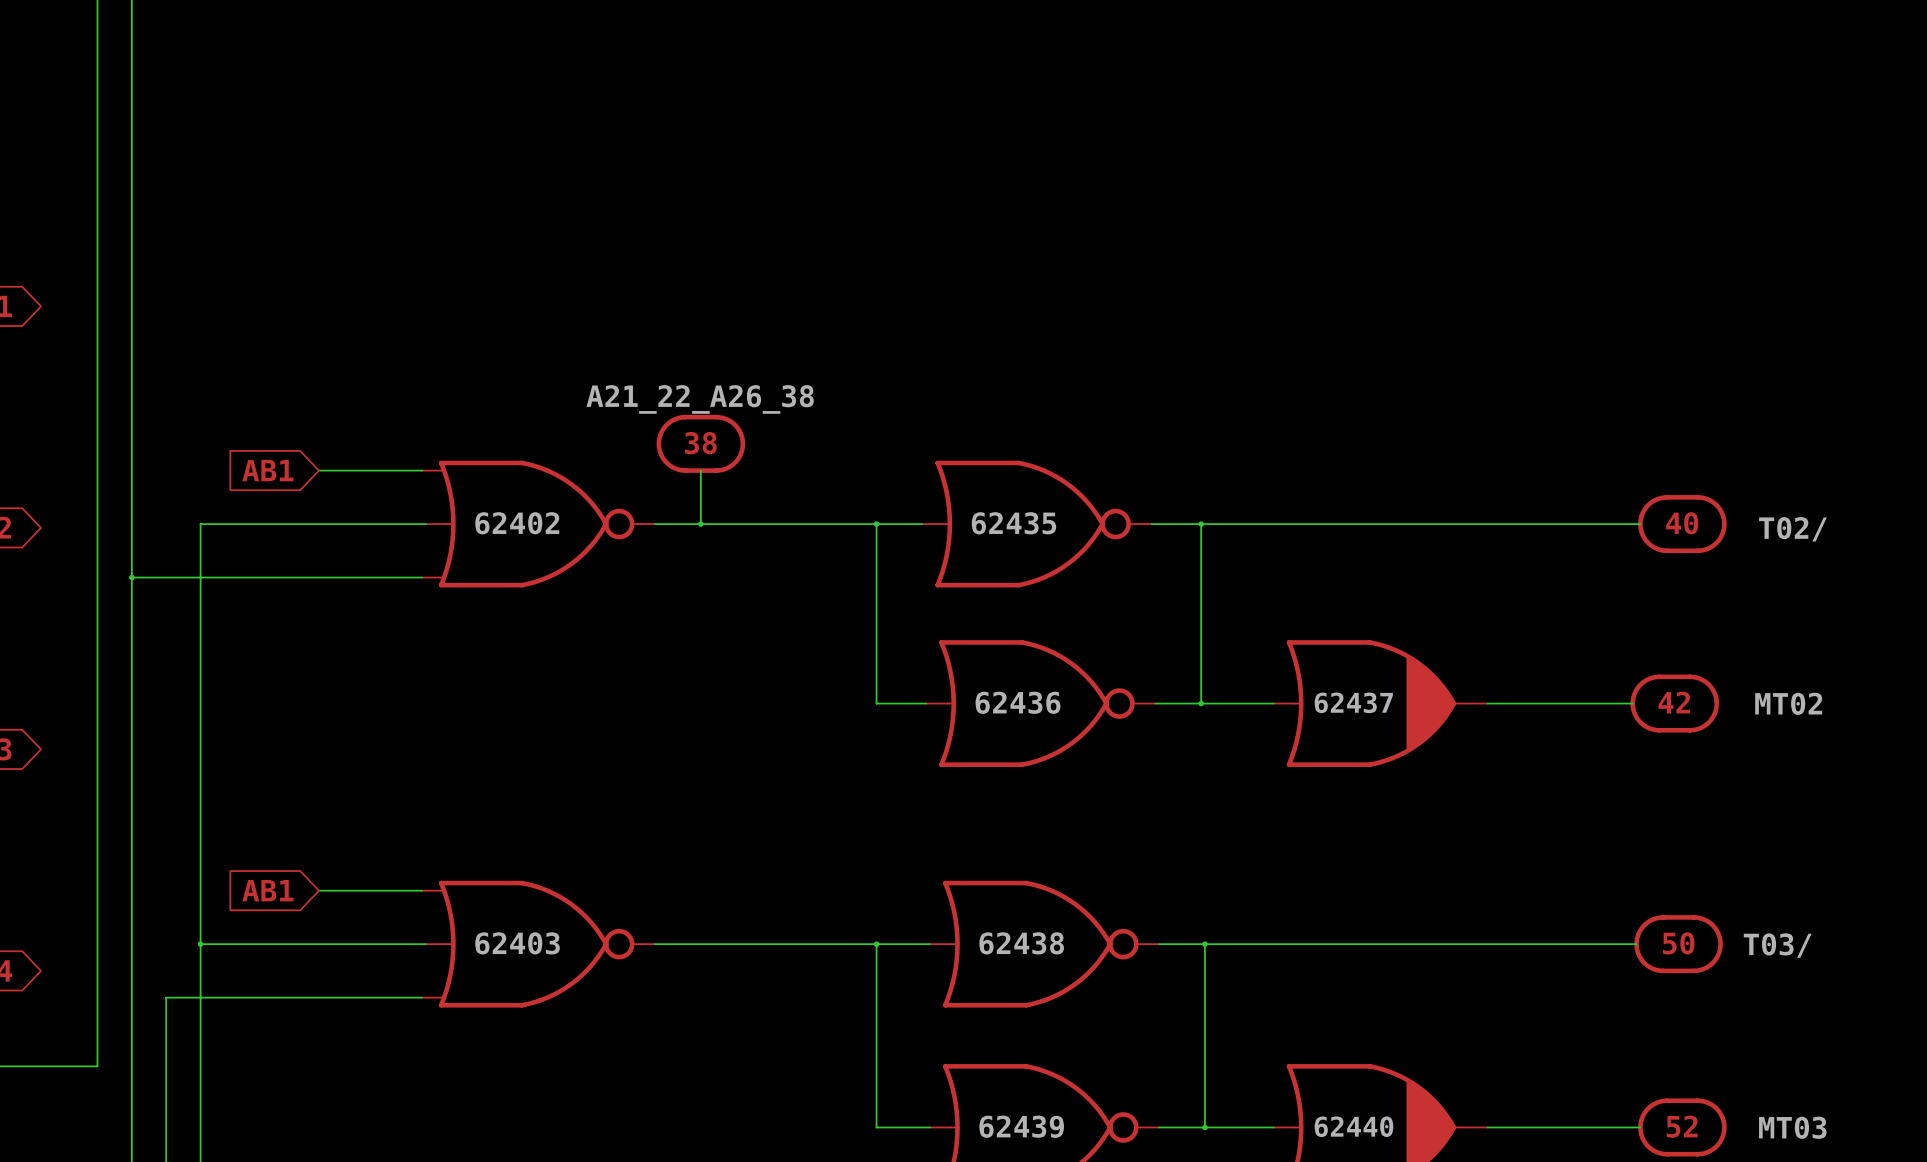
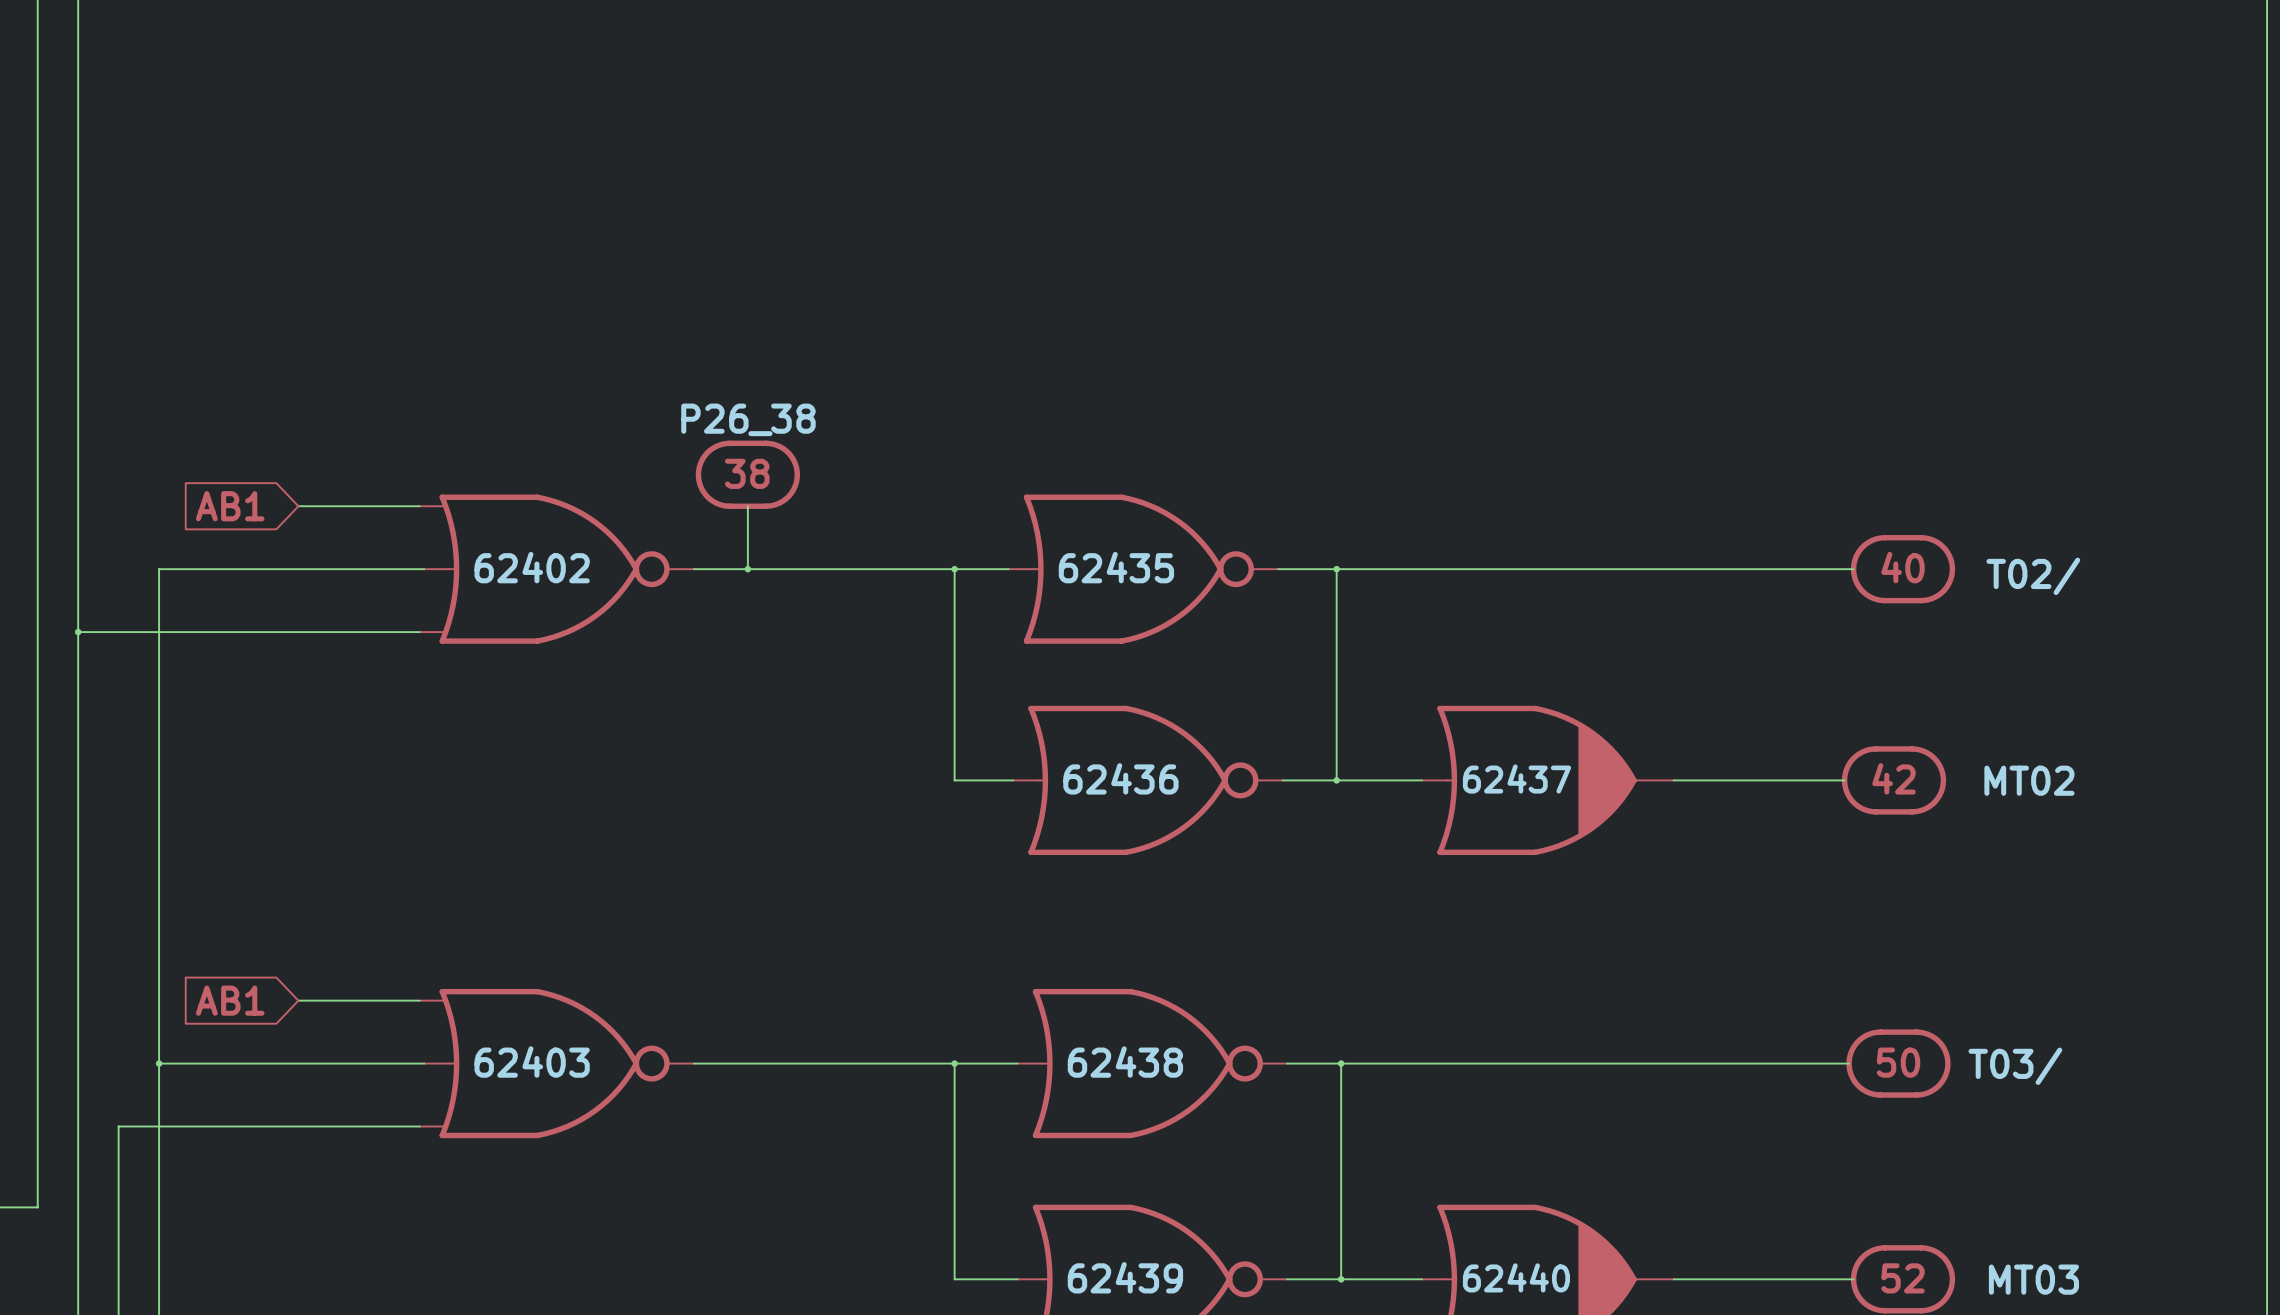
part text: A21_22_A26_38 (700, 399) -> P26_38 (748, 419)

